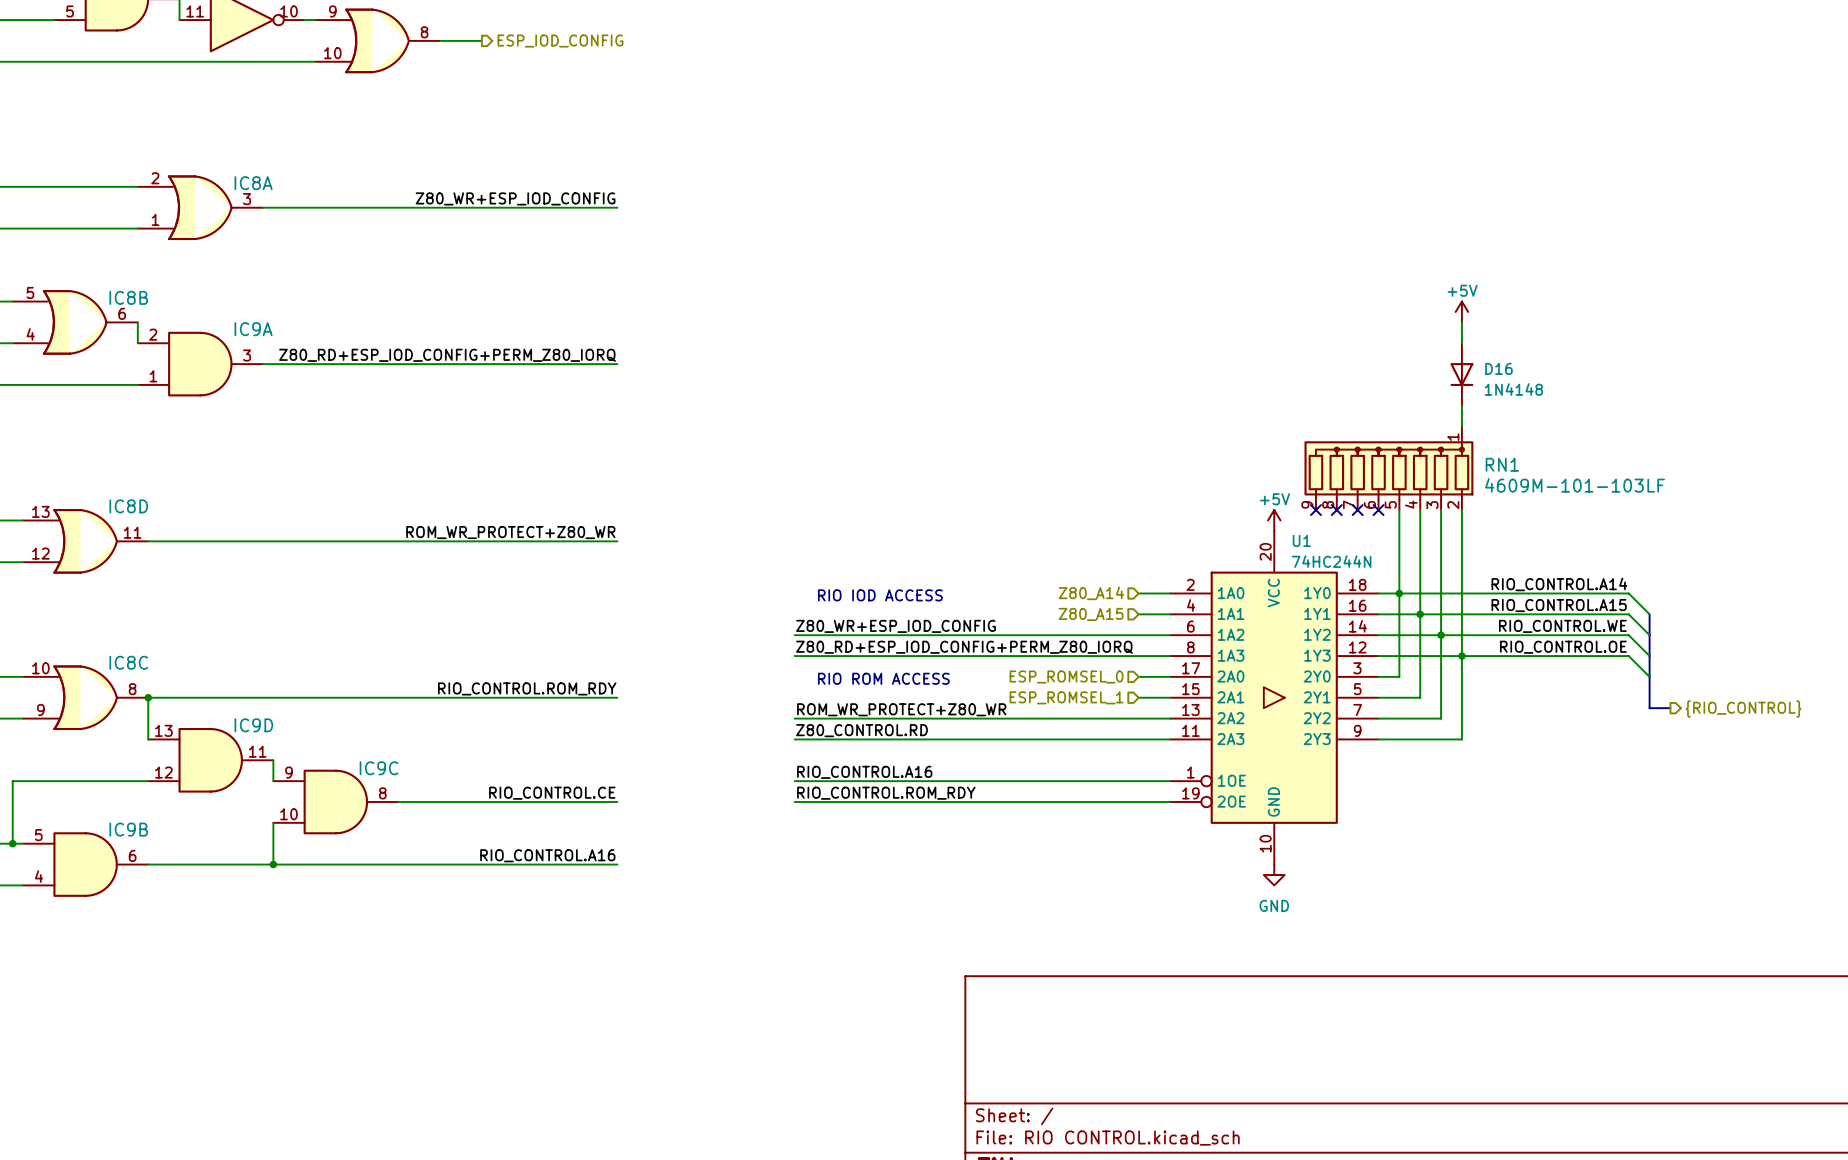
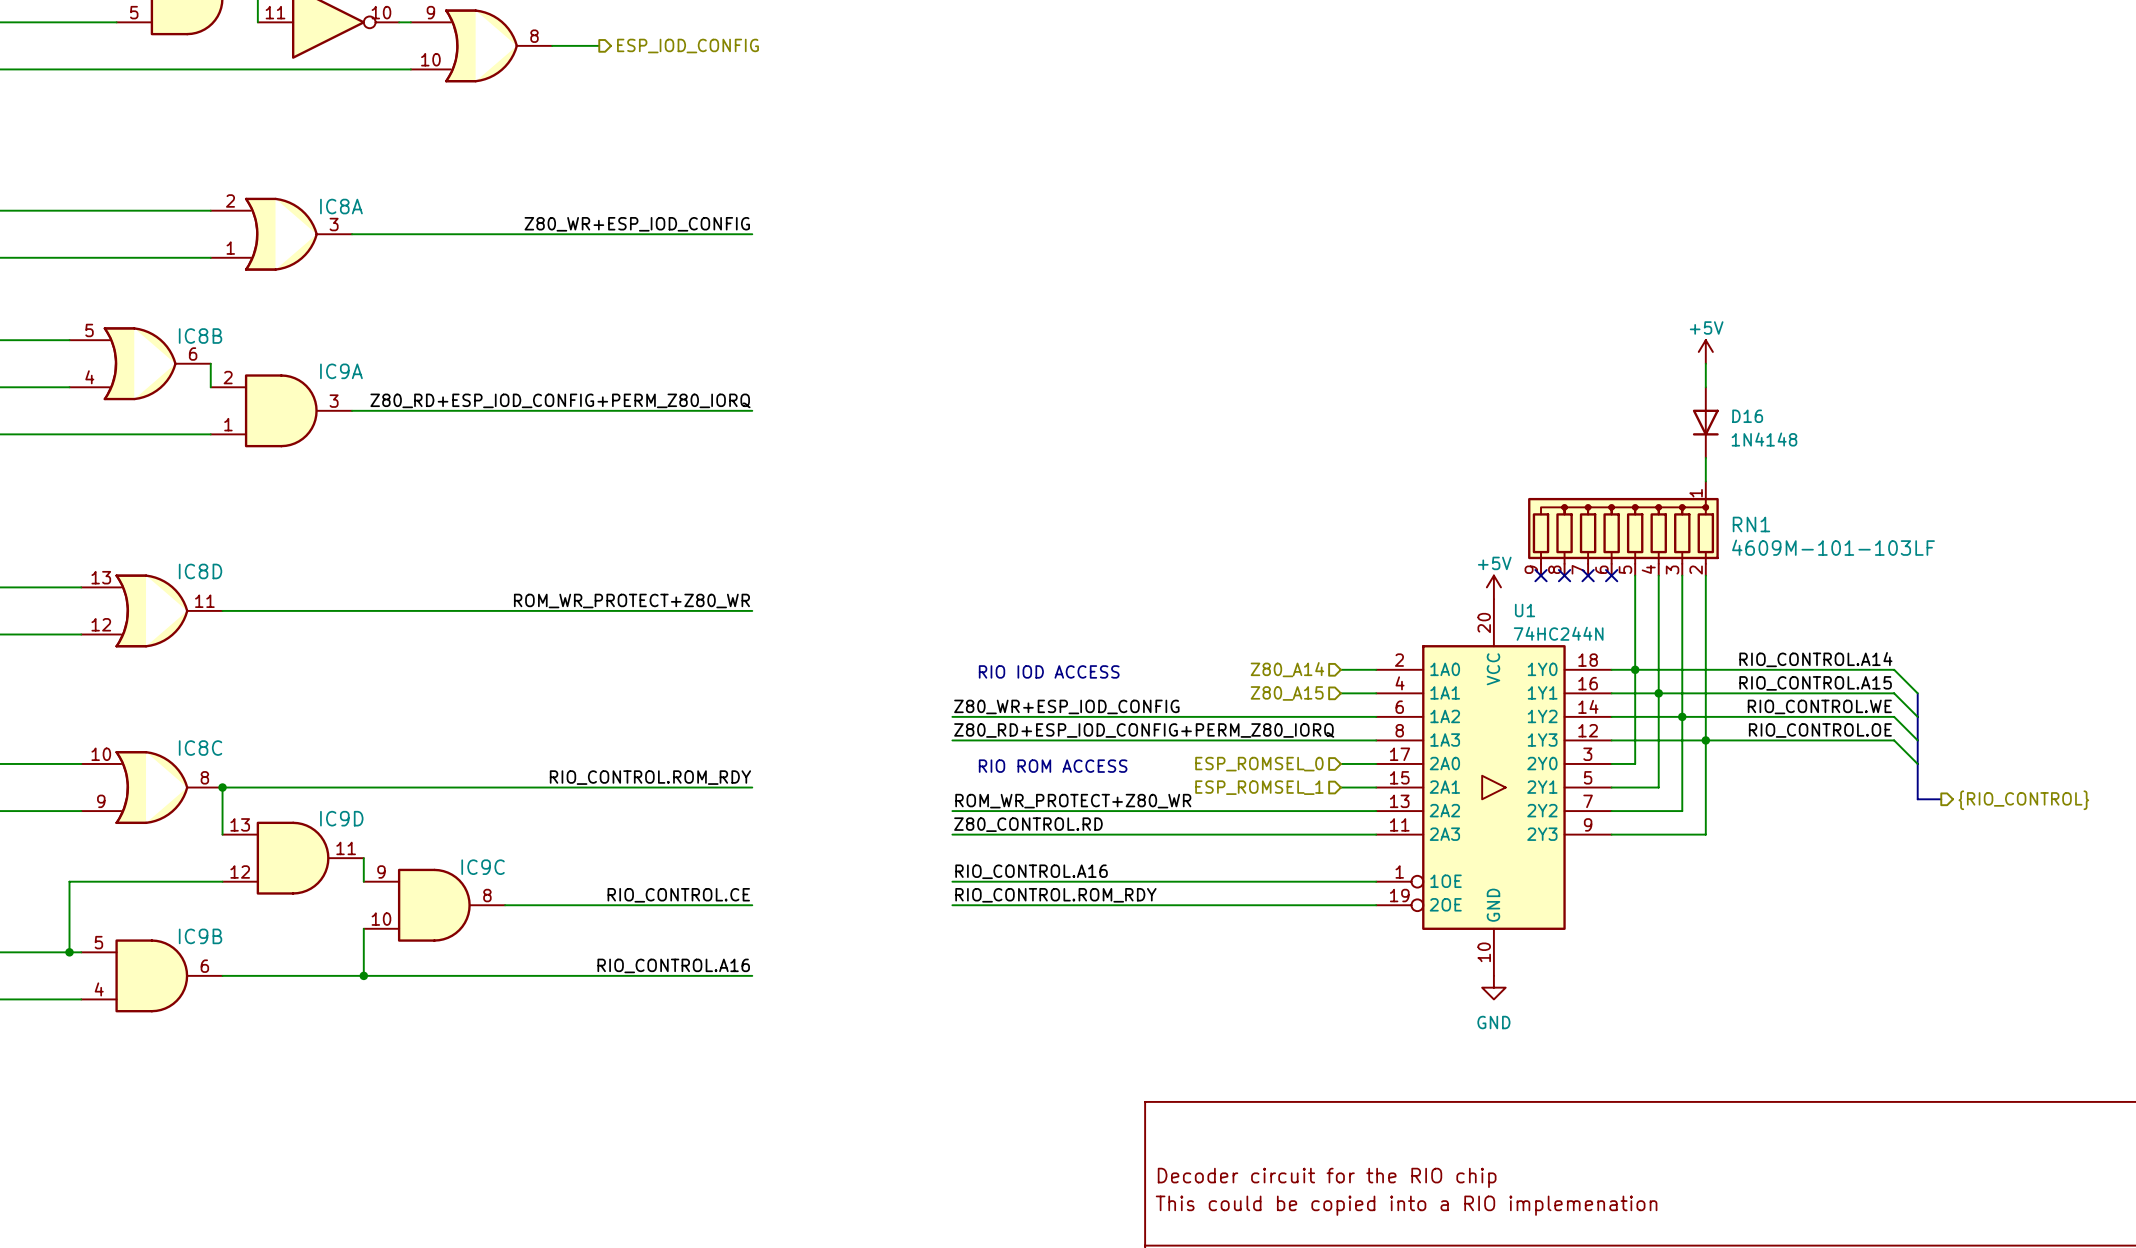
title block: none -> Decoder circuit for the RIO chip (1327, 1177)
title block: none -> This could be copied into a RIO implemenation (1406, 1205)

